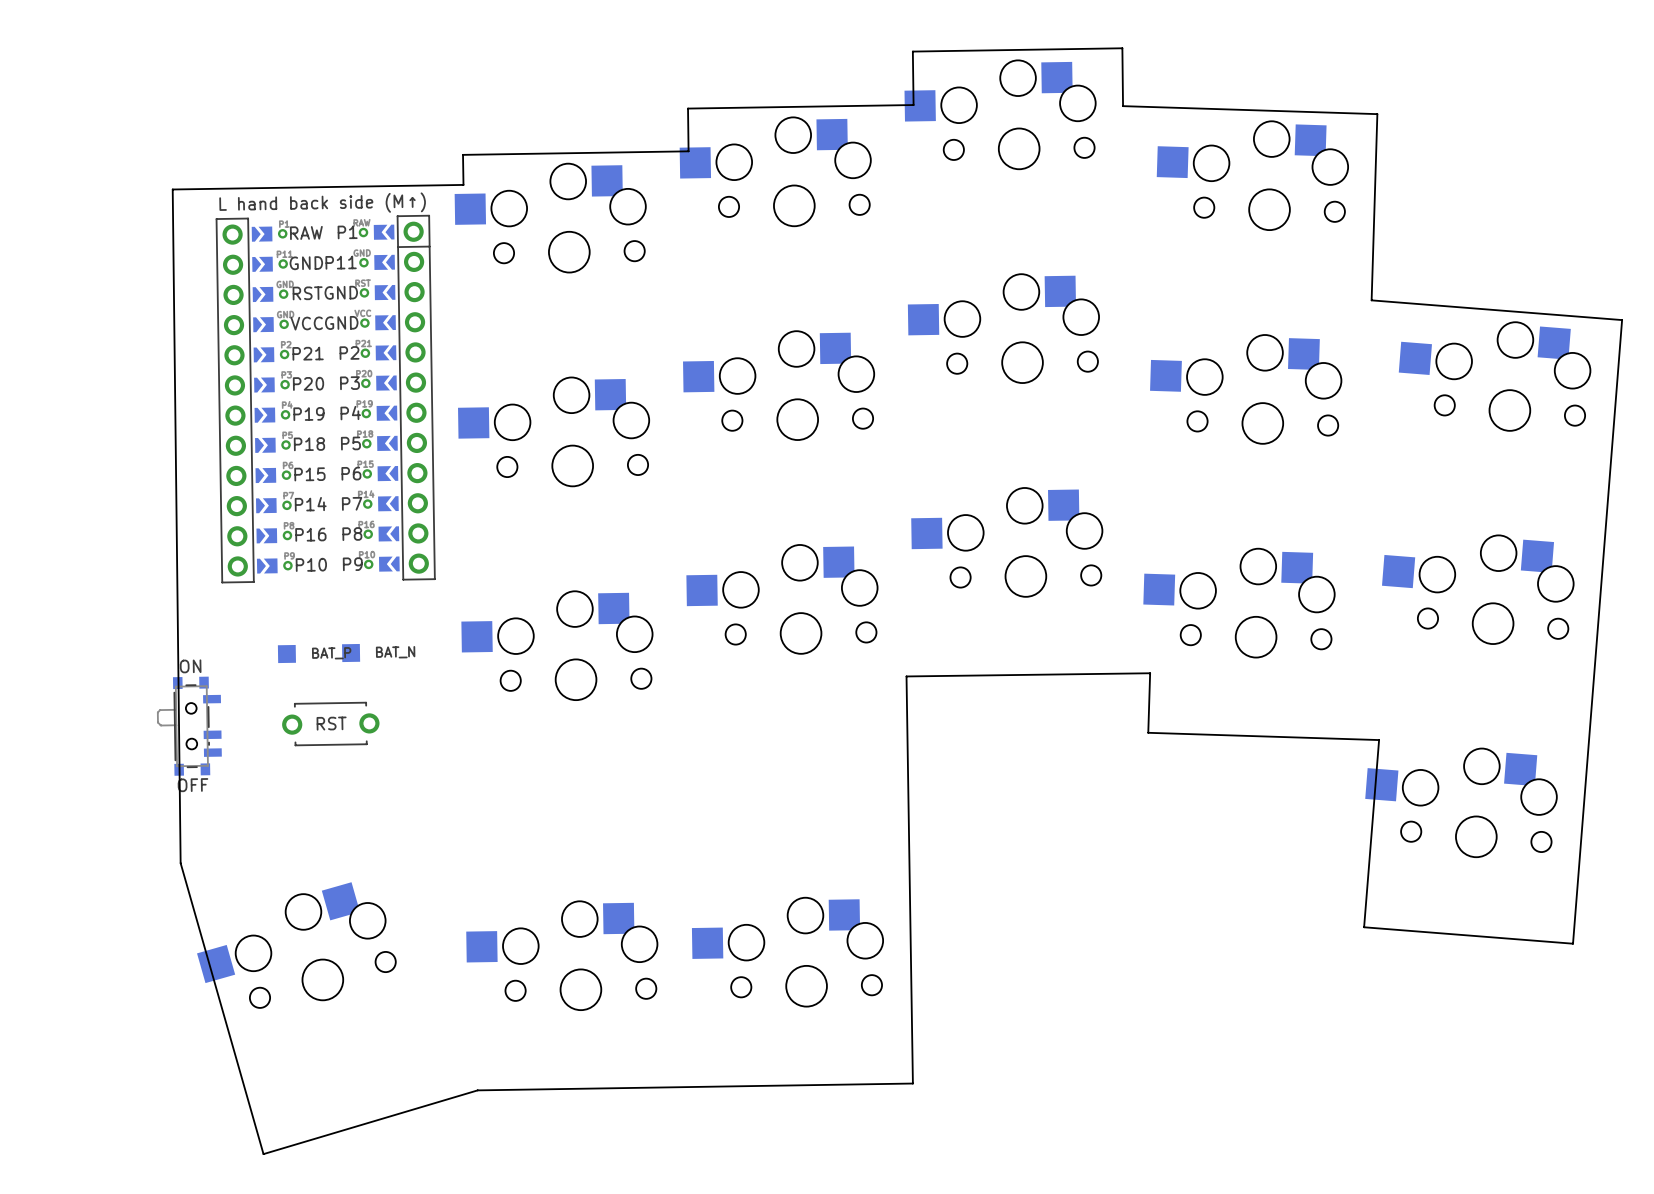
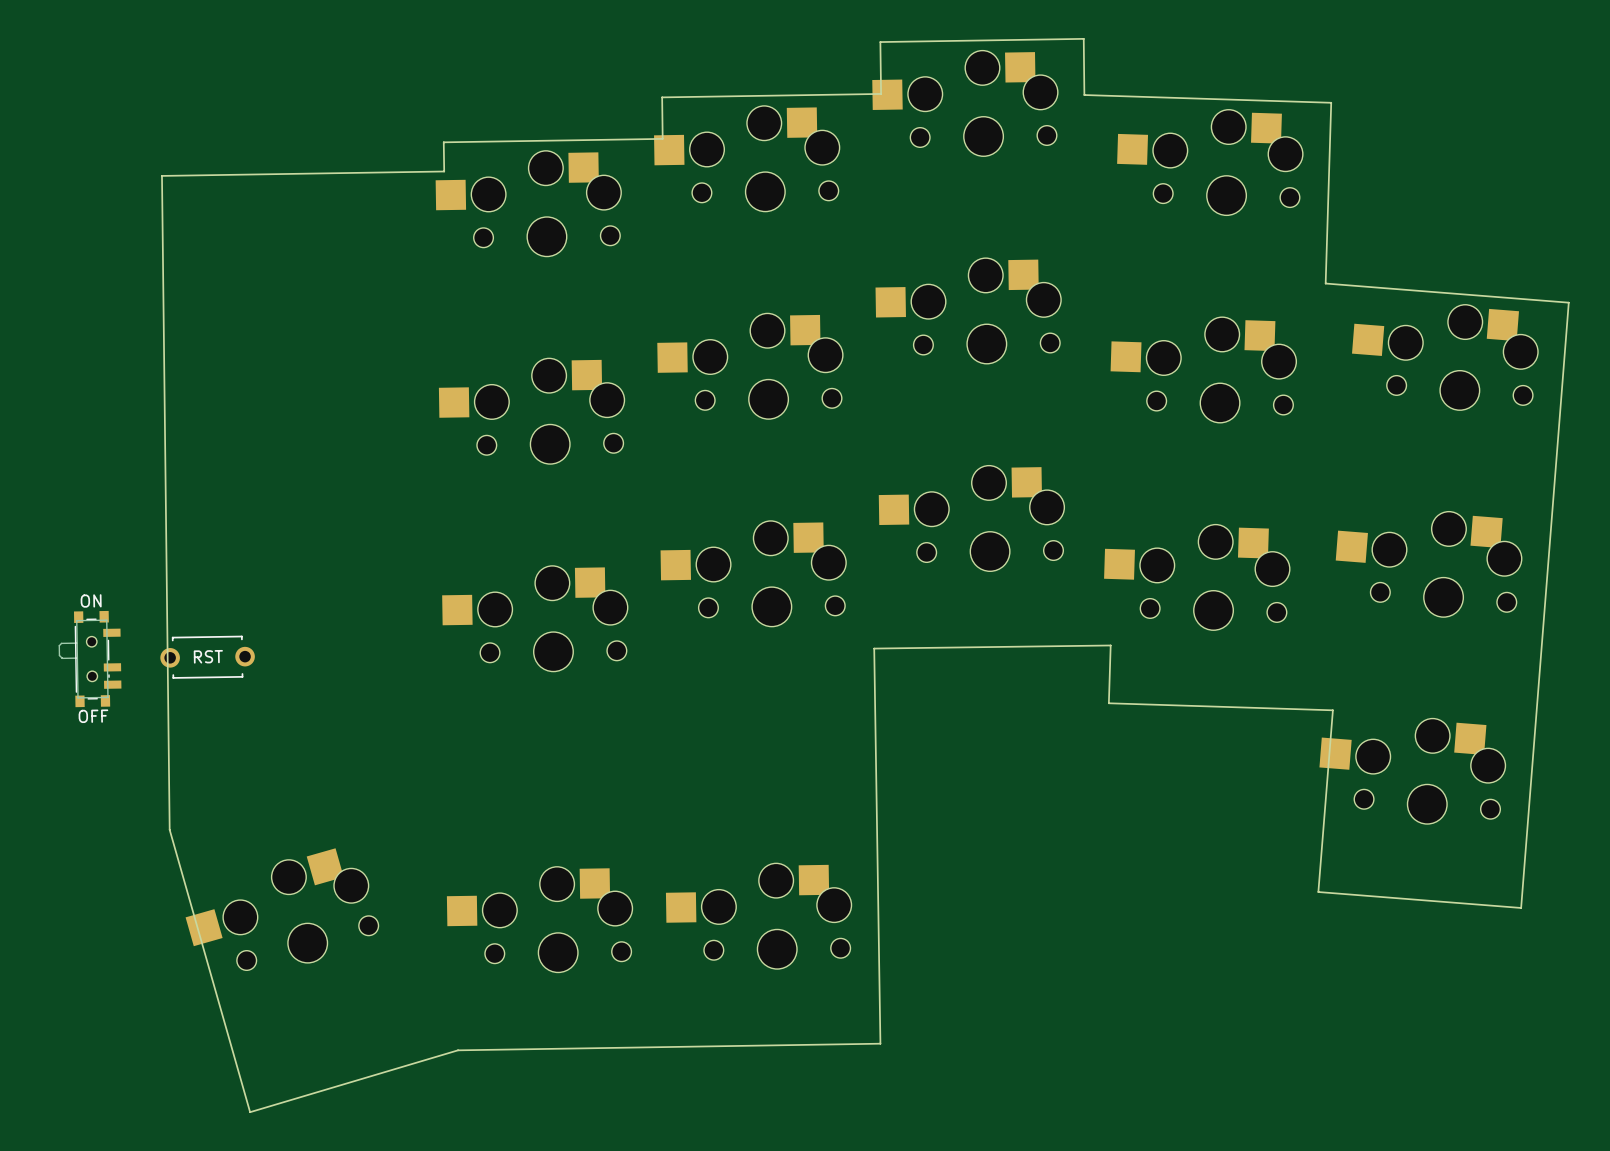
part: (325, 399) -> none
part: (351, 653) -> none
part: (286, 654) -> none
part position: (330, 724) -> (207, 657)
part position: (189, 726) -> (90, 659)

